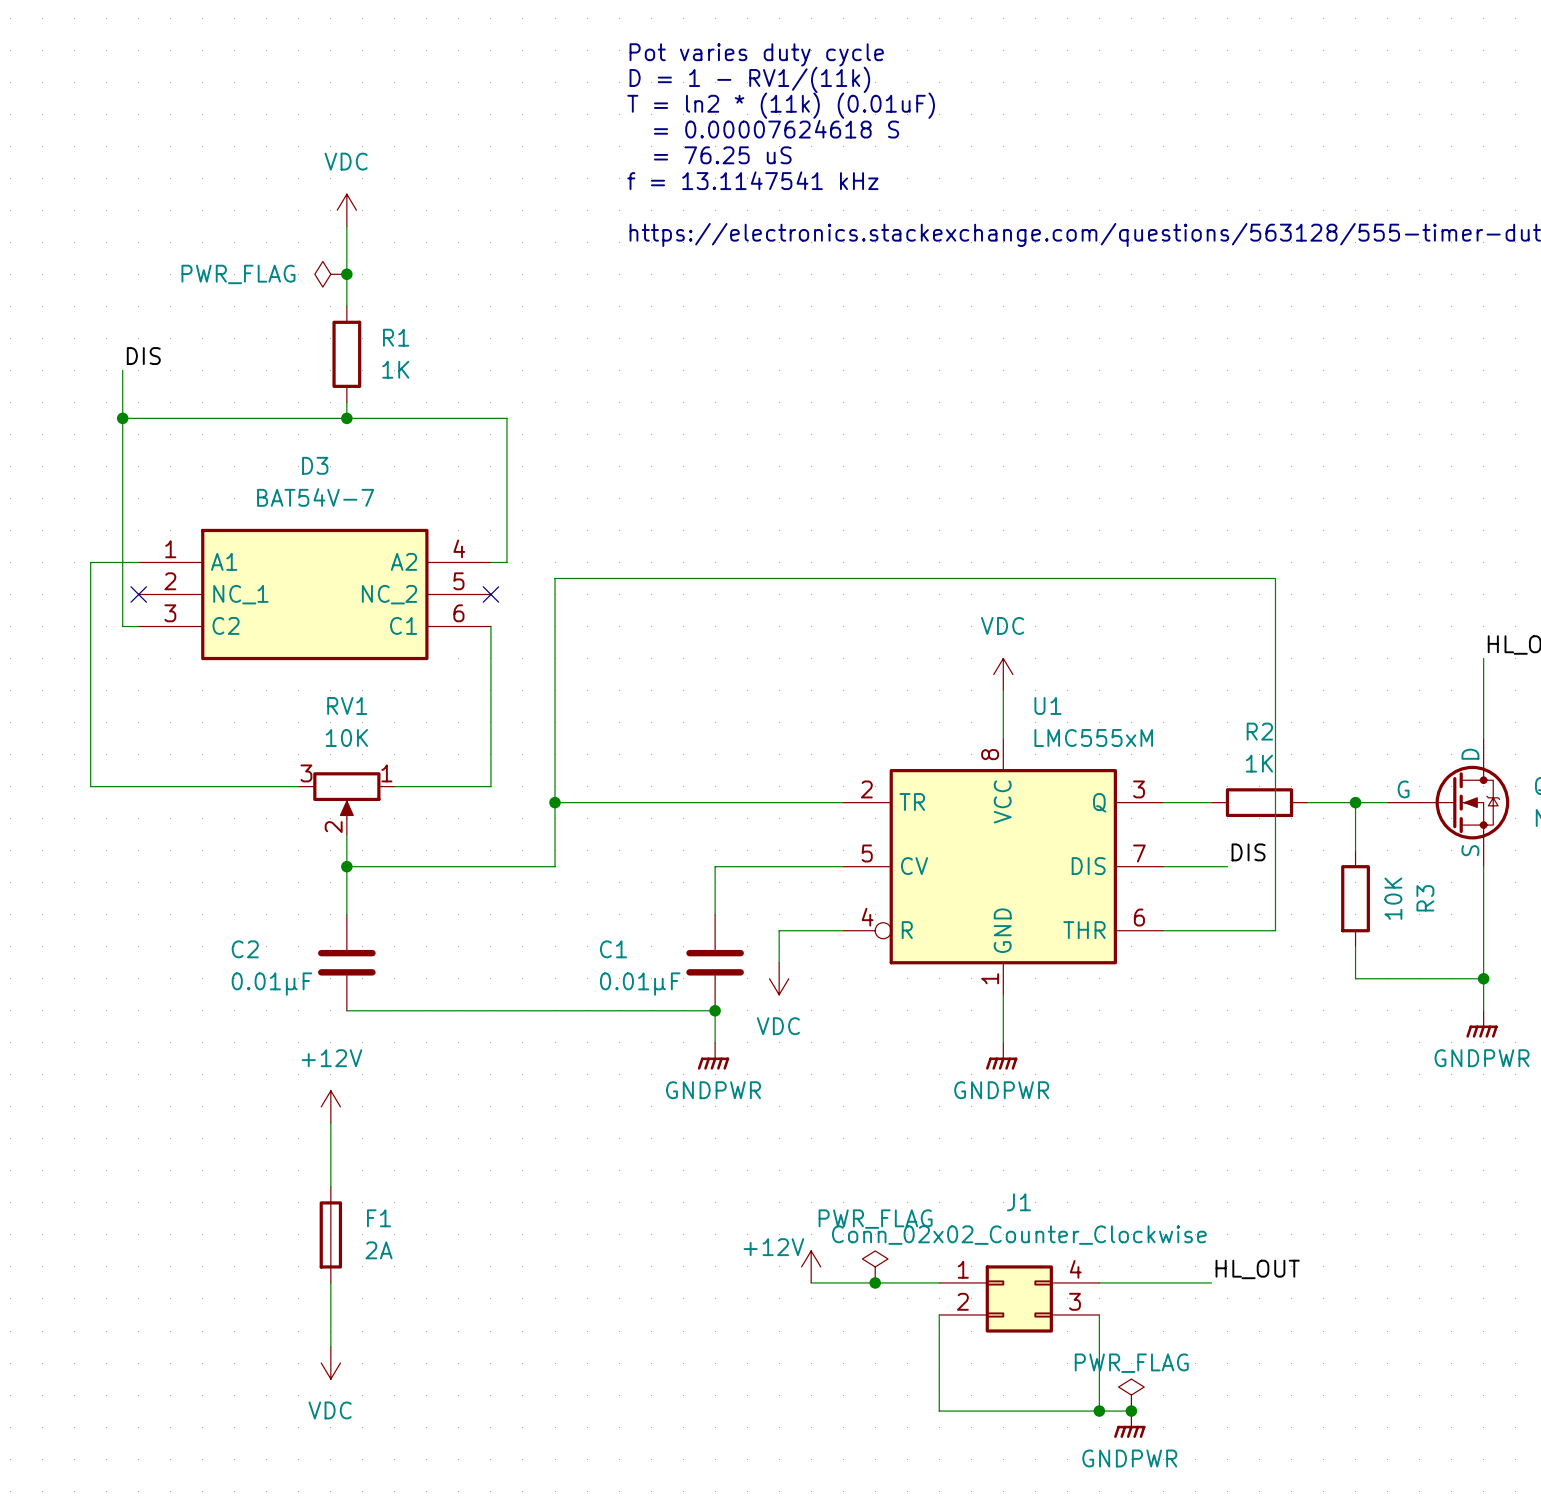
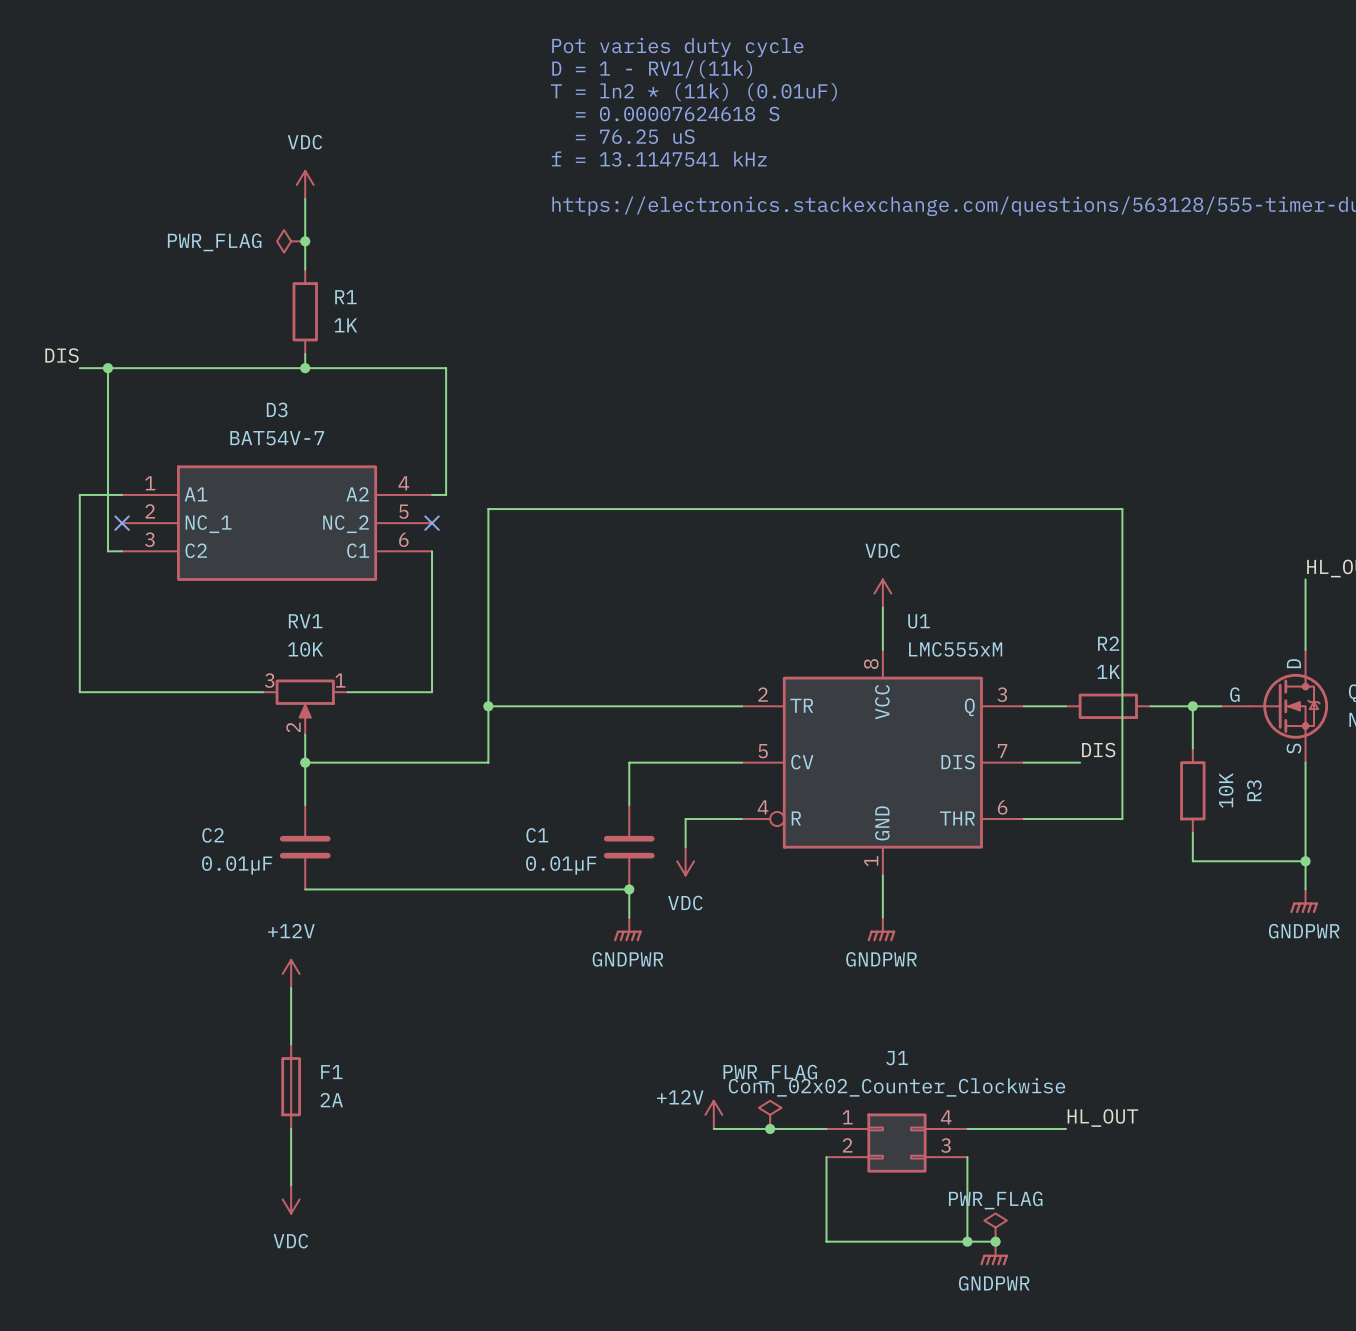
label position: DIS (143, 356) -> DIS (62, 355)
wire: (122, 370) (122, 418) -> (79, 368) (107, 368)

